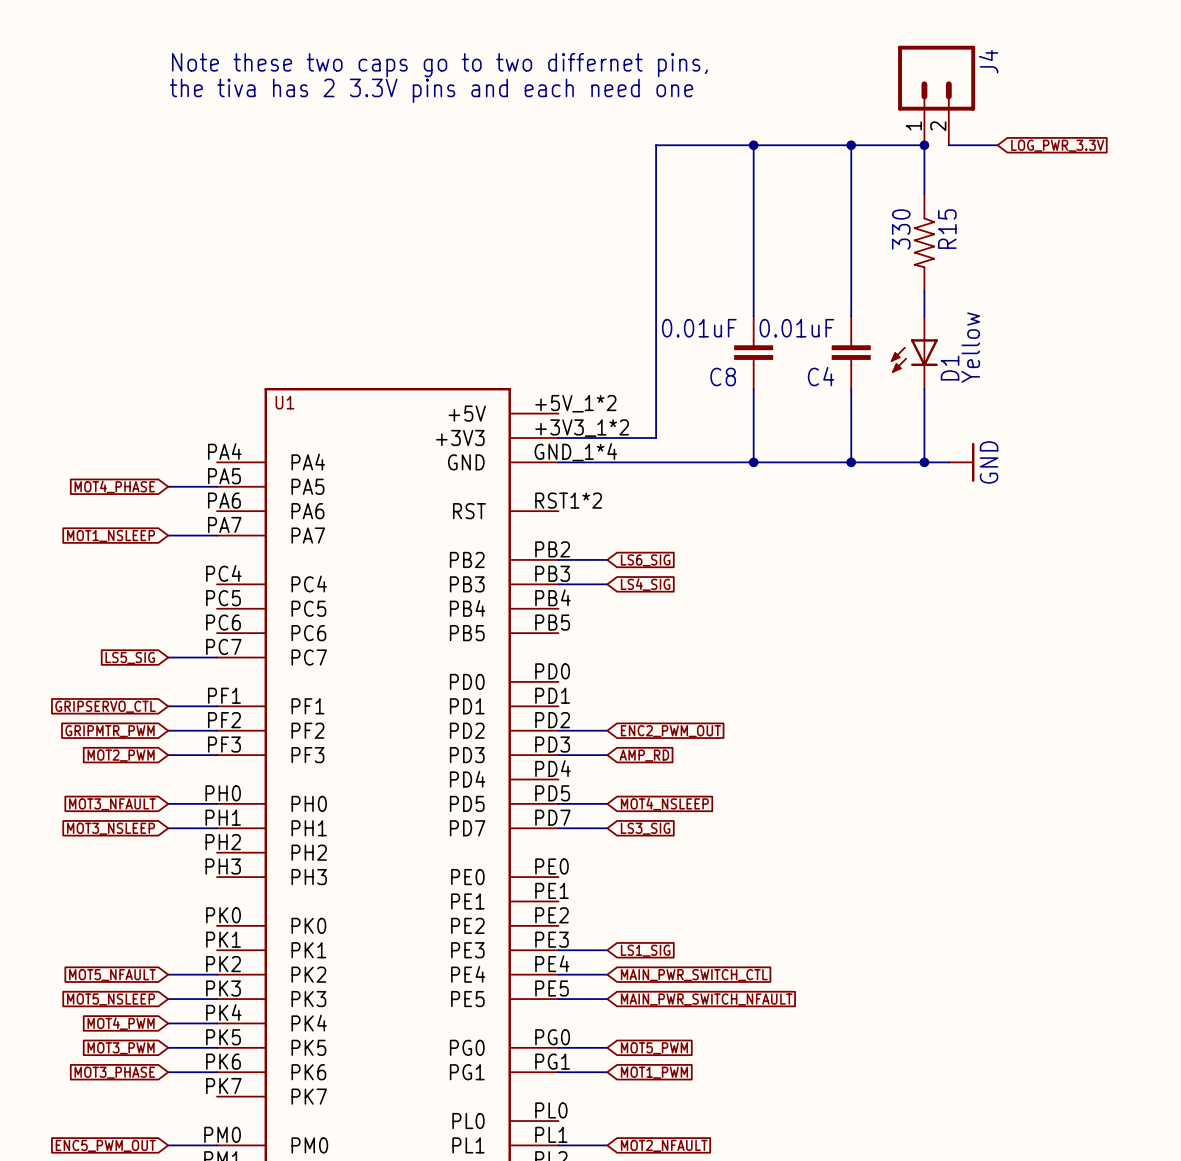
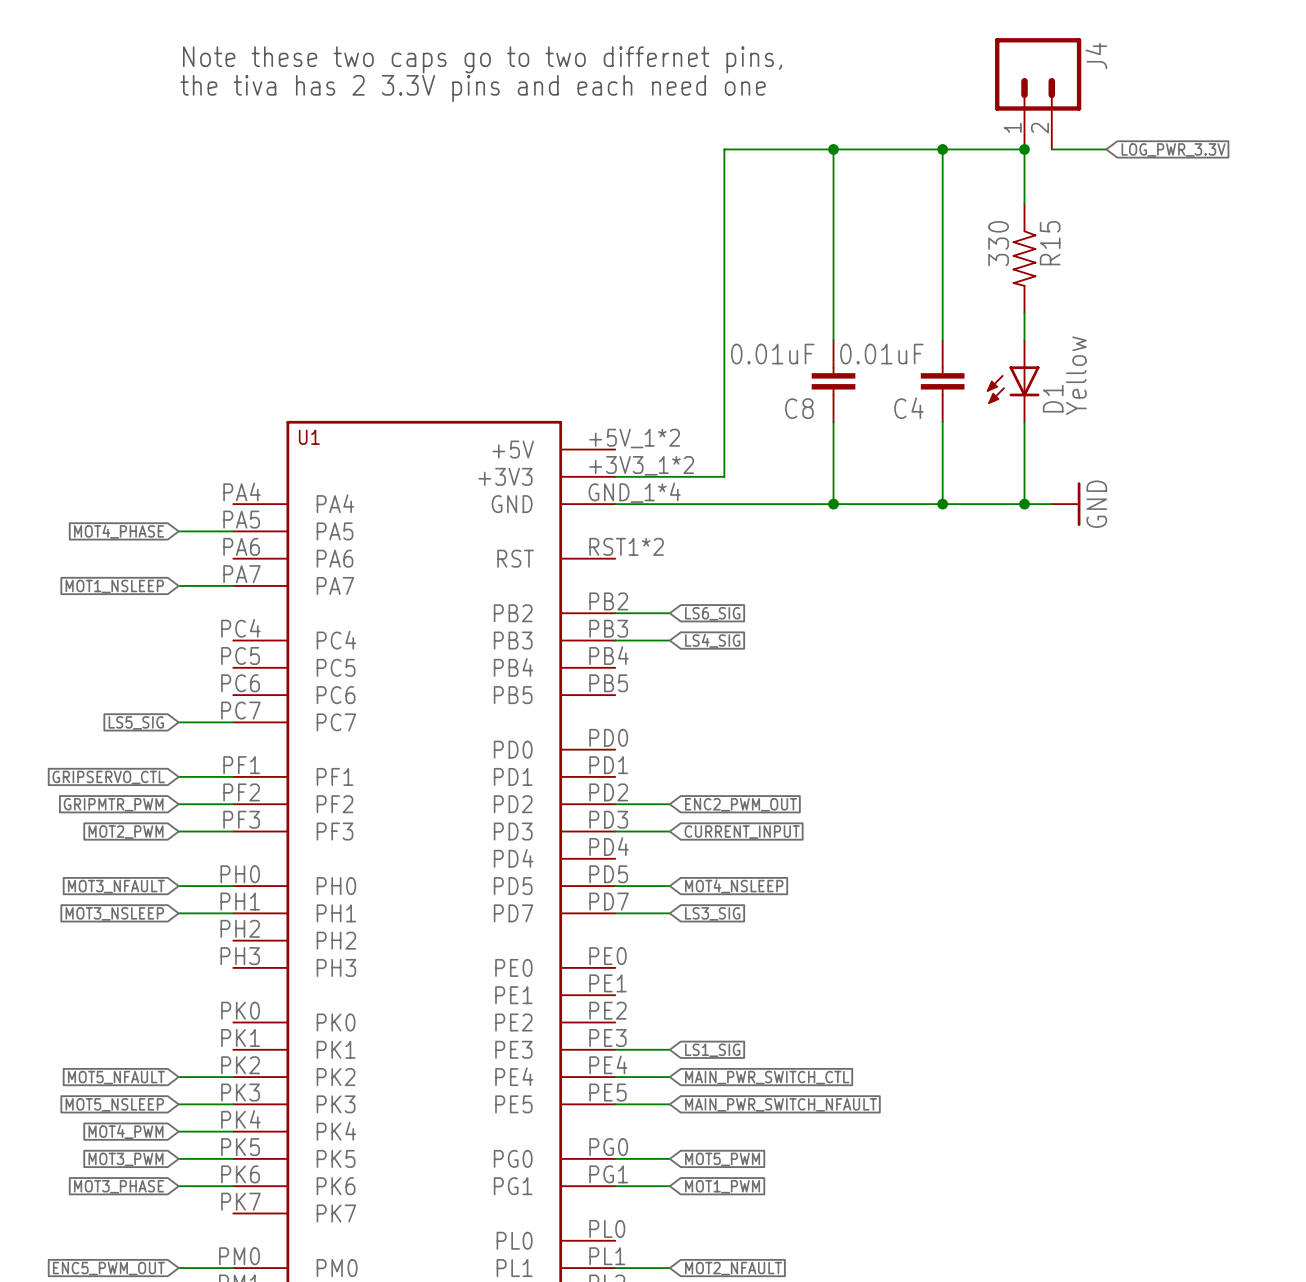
global label: AMP_RD (644, 755) -> CURRENT_INPUT (742, 832)

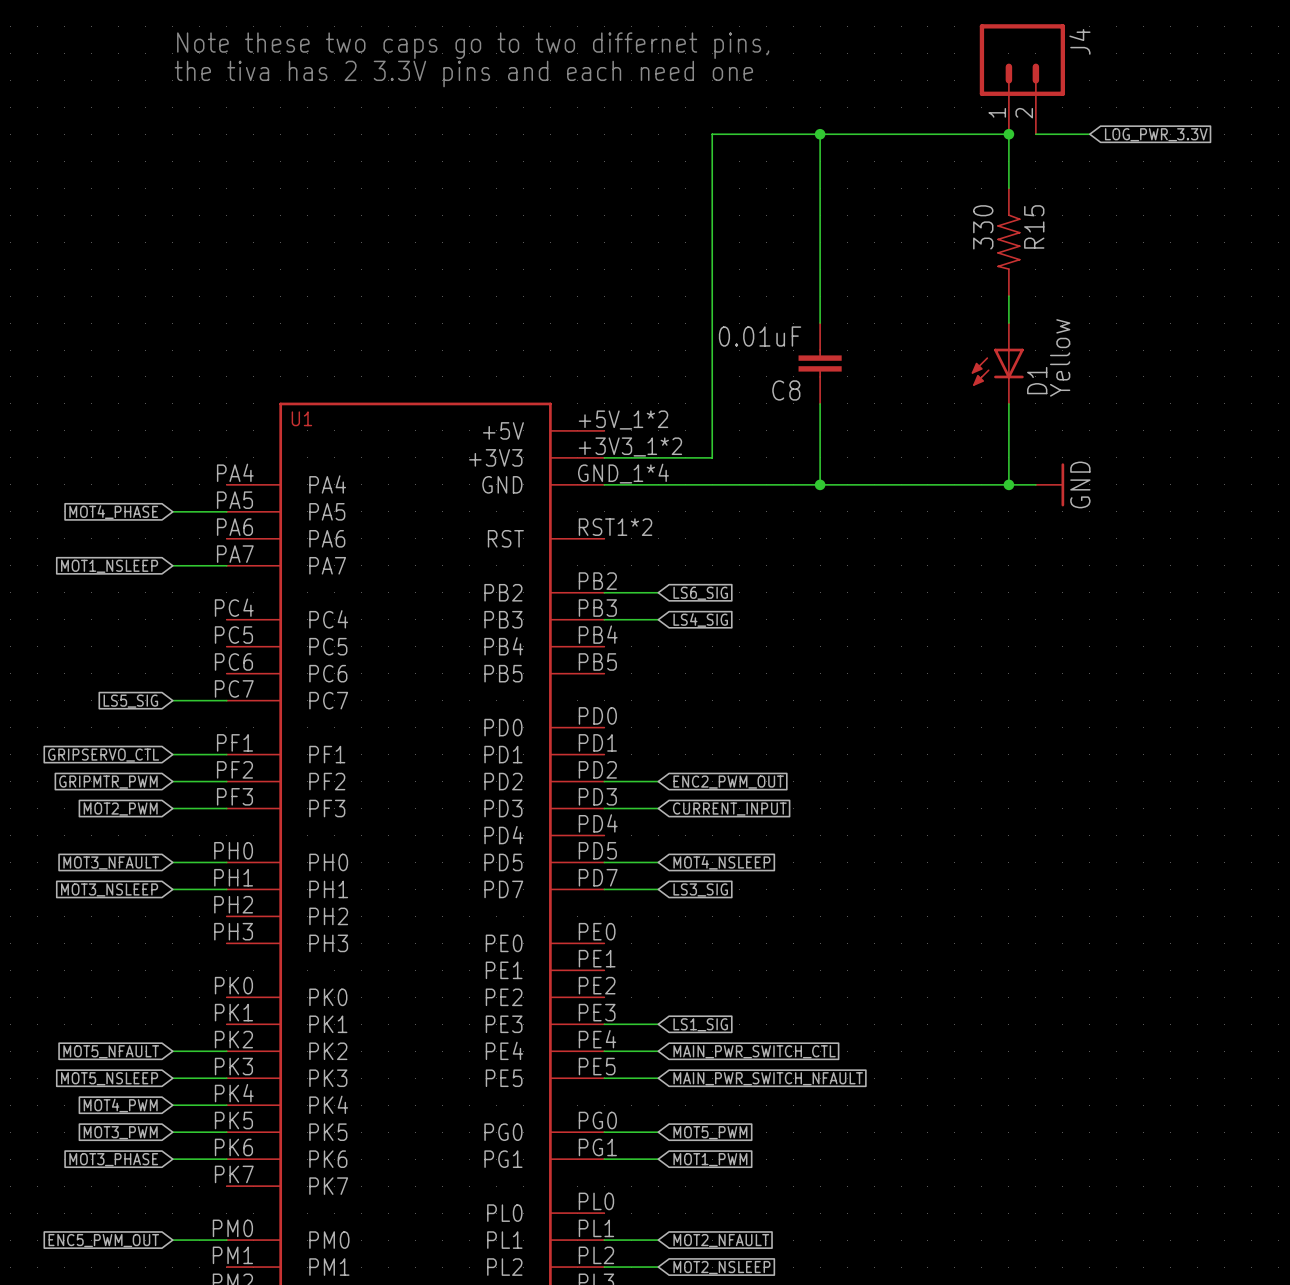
wire: (942, 149) (942, 340) -> none
junction: (942, 149) -> none
C4: 0.01uF (942, 381) -> none
wire: (942, 422) (942, 504) -> none
junction: (942, 504) -> none

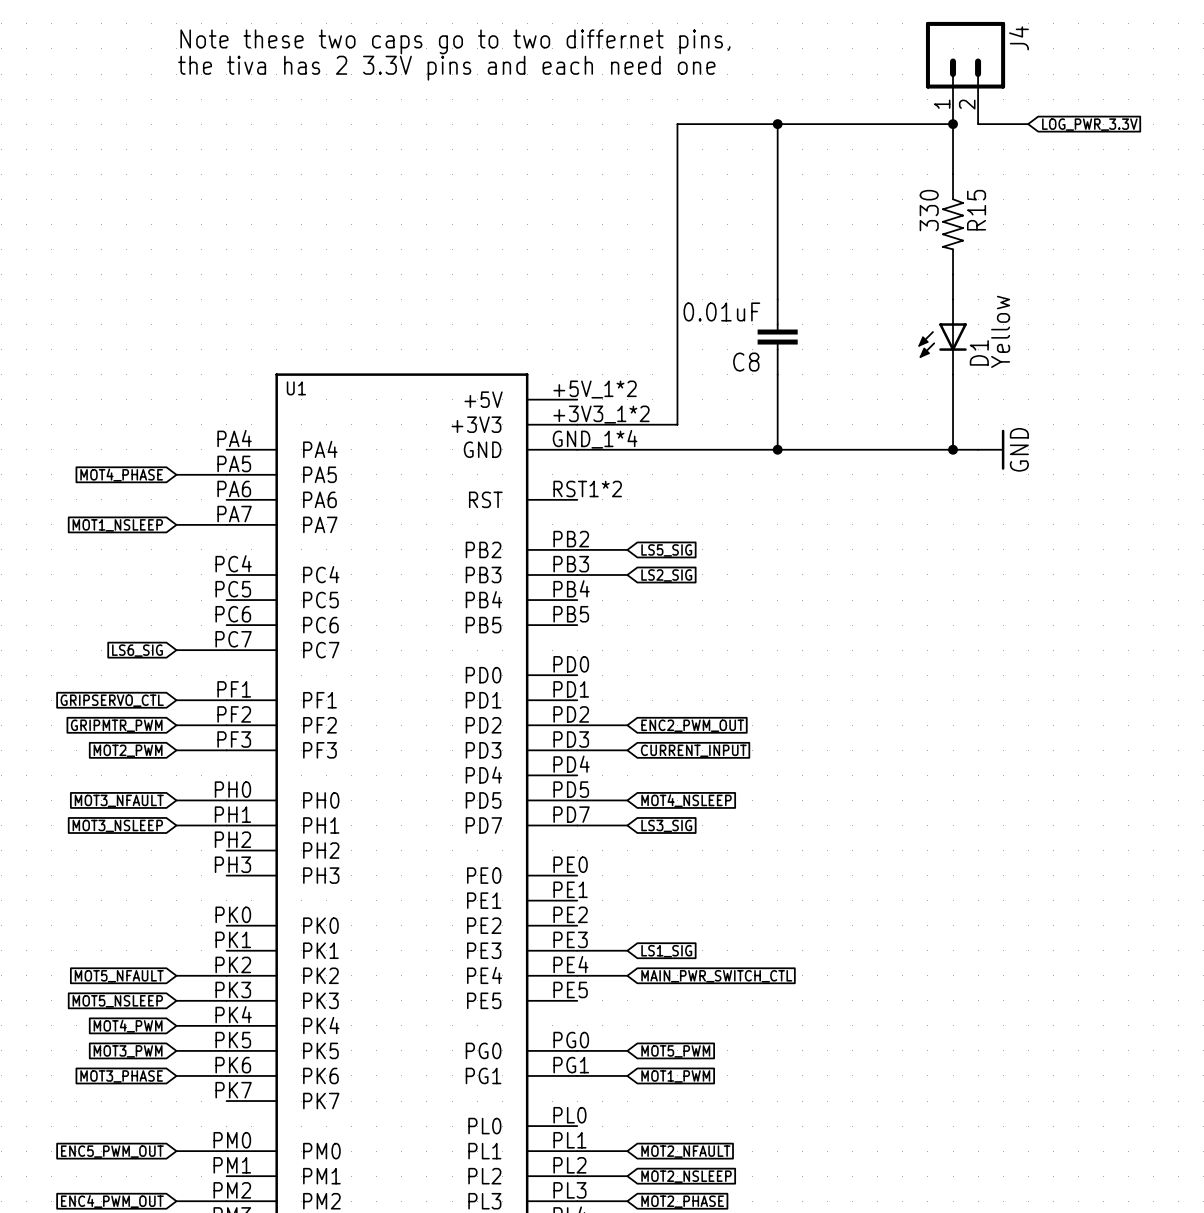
global label: LS6_SIG (700, 593) -> LS5_SIG (666, 550)
global label: LS4_SIG (700, 619) -> LS2_SIG (666, 575)
global label: LS5_SIG (130, 701) -> LS6_SIG (137, 650)
wire: (604, 1078) (658, 1078) -> none
global label: MAIN_PWR_SWITCH_NFAULT (768, 1078) -> none

